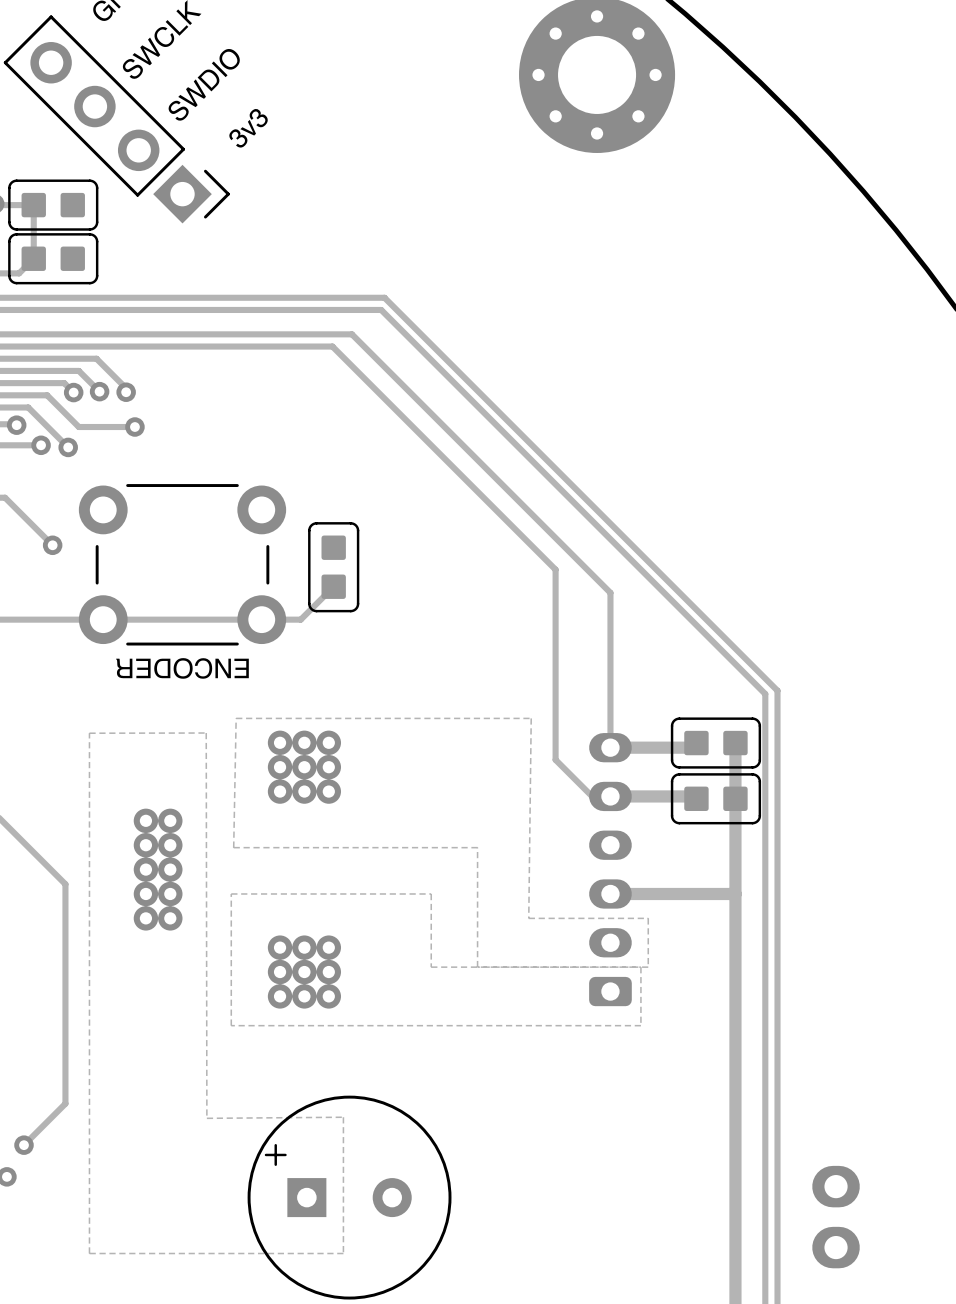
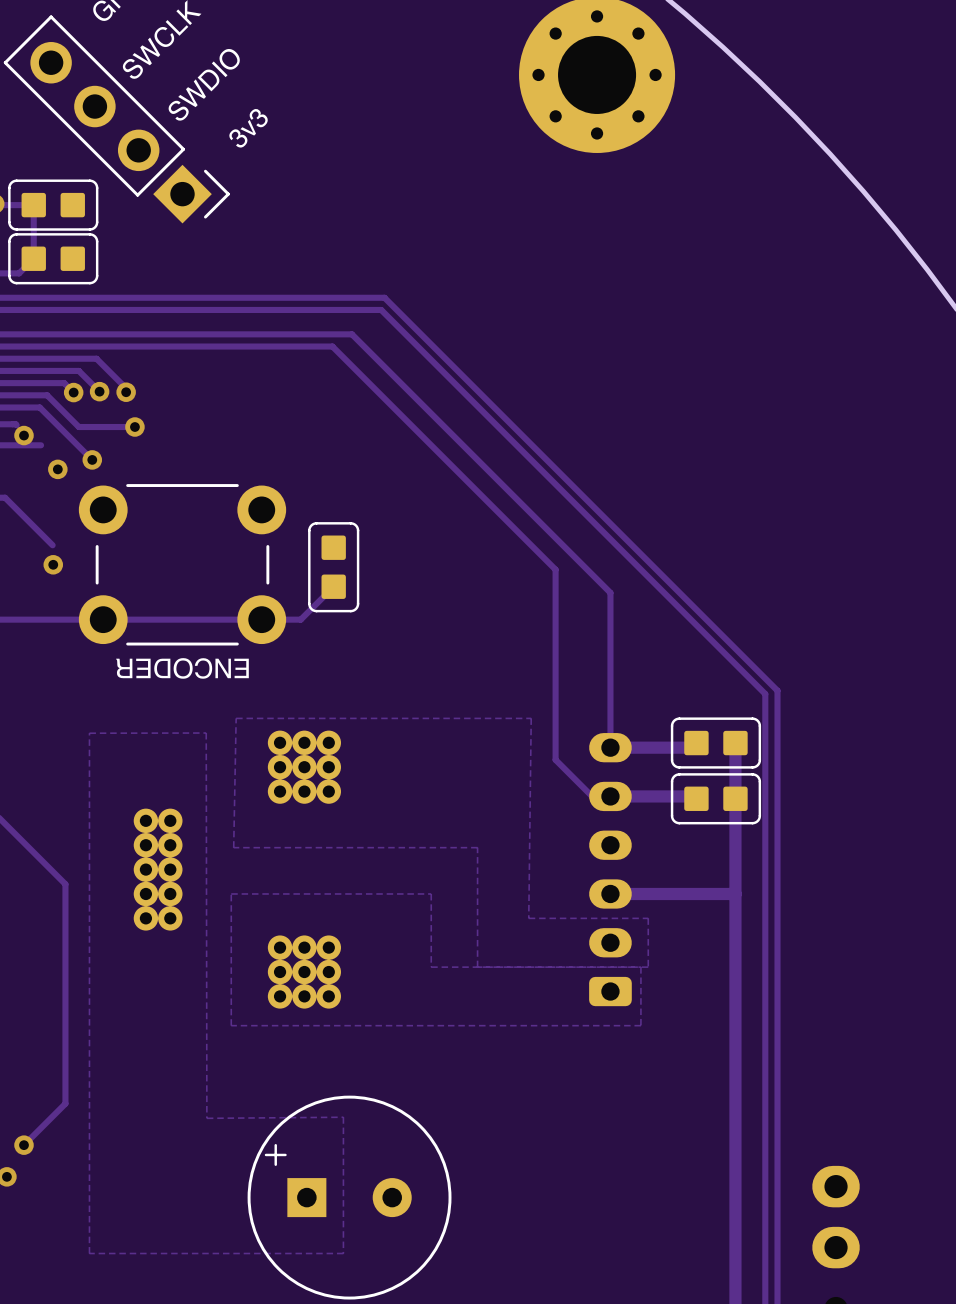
track: (28, 407) (68, 447) -> (28, 407) (39, 407) (92, 459)
via: (16, 425) -> none
via: none -> (23, 435)
via: (41, 445) -> none
via: (68, 447) -> none
via: none -> (92, 459)
via: none -> (57, 469)
via position: (52, 545) -> (53, 564)

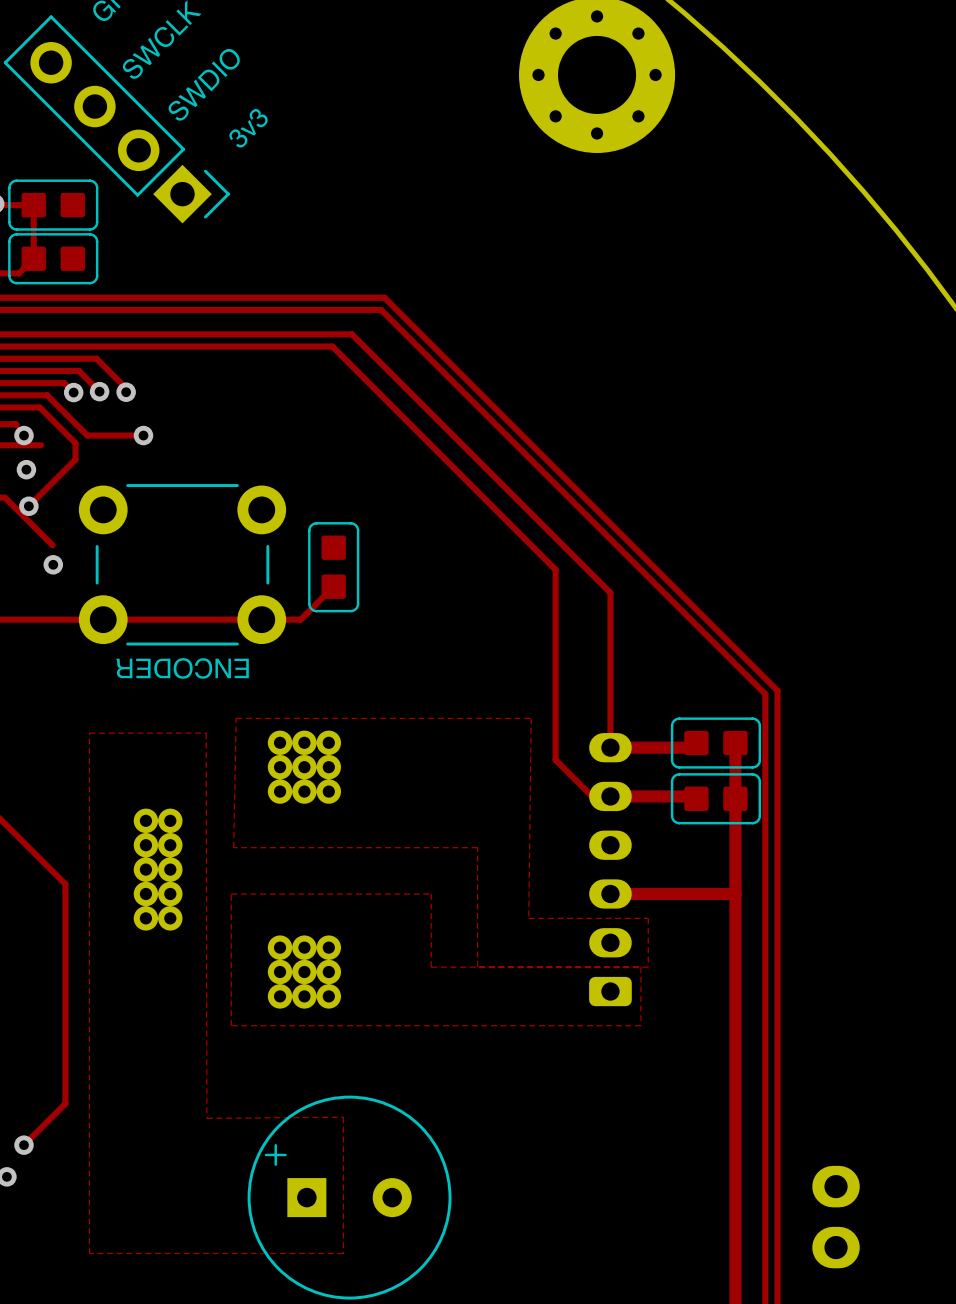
track: (78, 427) (134, 427) -> (78, 427) (87, 435) (143, 435)
via position: (134, 427) -> (143, 435)
track: (75, 443) (92, 459) -> (75, 443) (75, 459) (28, 506)
via: (92, 459) -> none
via: none -> (26, 469)
via: (57, 469) -> none
via: none -> (28, 506)

